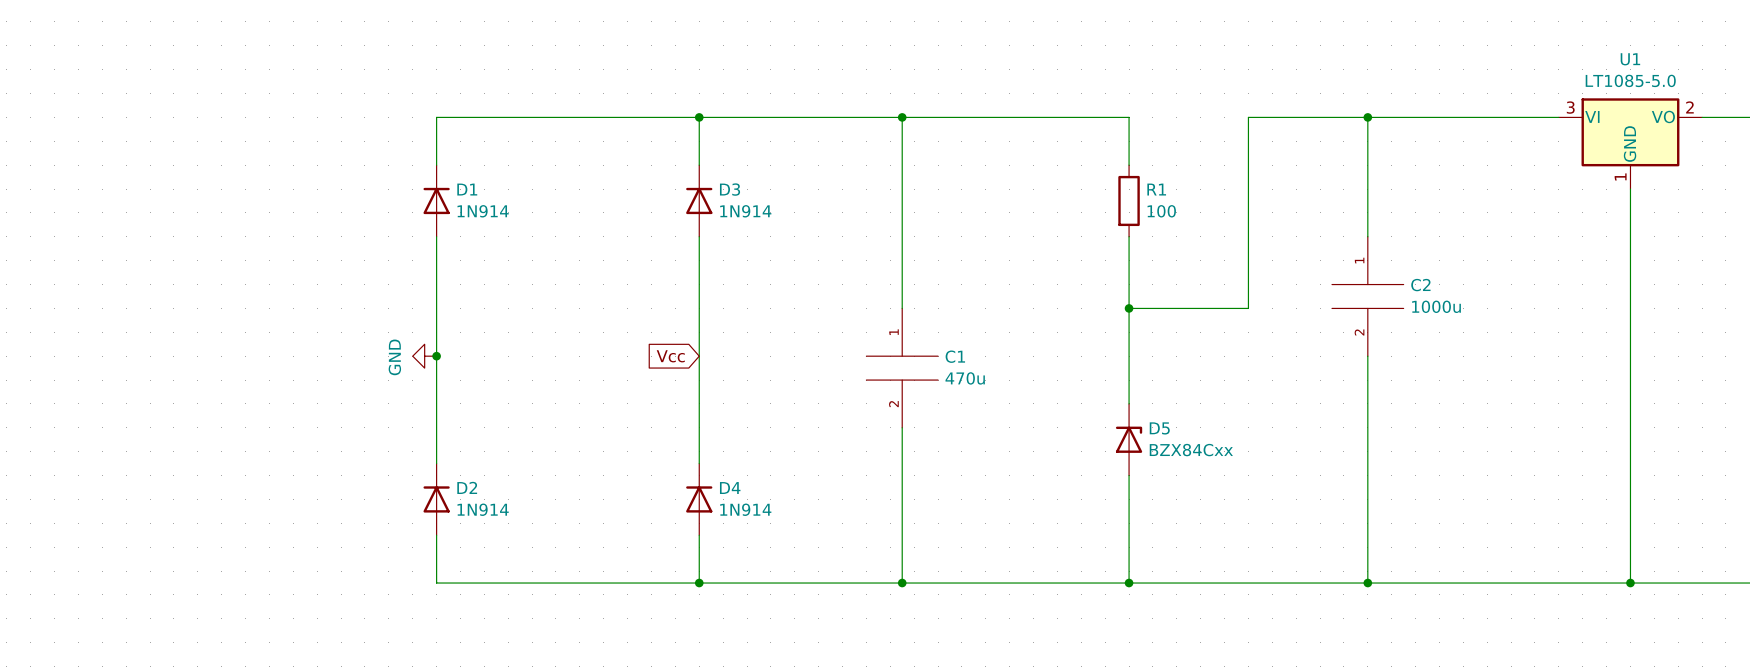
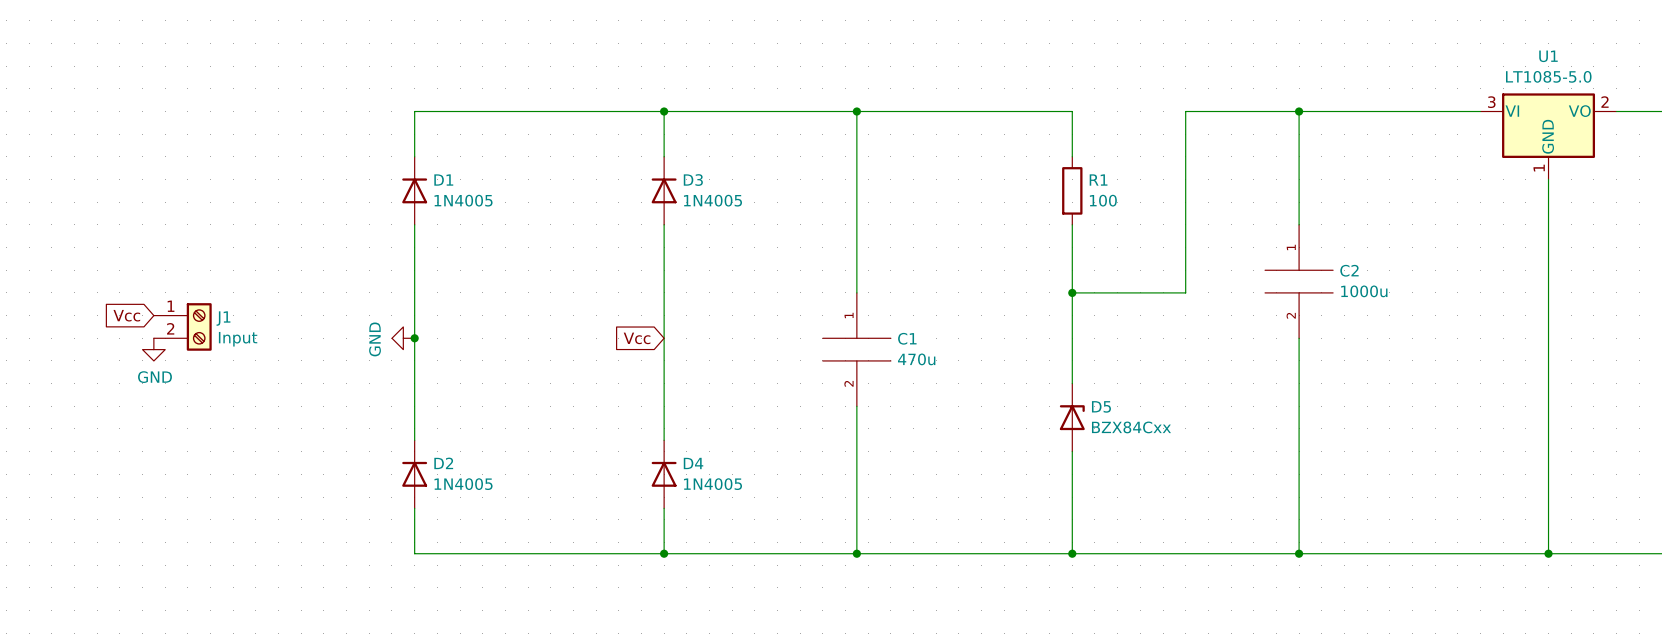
D1 value: 1N914 (483, 211) -> 1N4005 (463, 200)
D3 value: 1N914 (745, 211) -> 1N4005 (712, 200)
global label: none -> Vcc (126, 315)
J1: none -> Input (182, 326)
power symbol: none -> GND (153, 349)
D2 value: 1N914 (483, 509) -> 1N4005 (463, 484)
D4 value: 1N914 (745, 509) -> 1N4005 (712, 484)

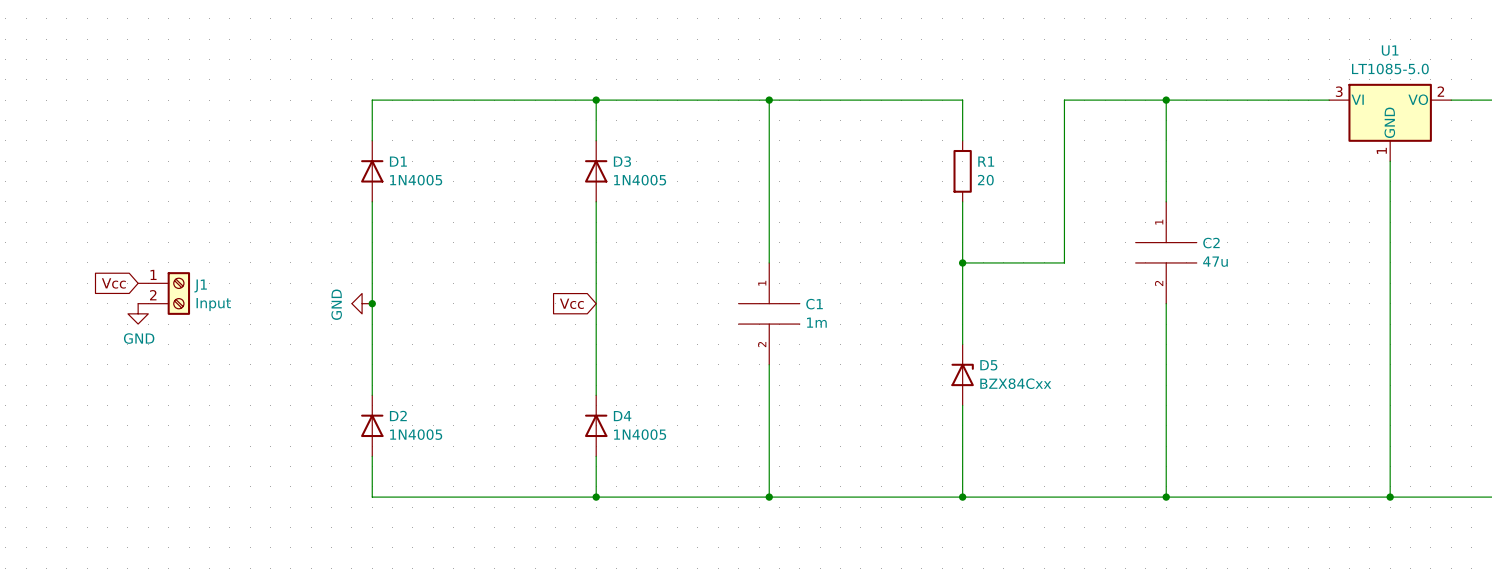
R1 value: 100 (1103, 200) -> 20 (985, 180)
C2 value: 1000u (1364, 291) -> 47u (1215, 261)
C1 value: 470u (916, 359) -> 1m (816, 322)

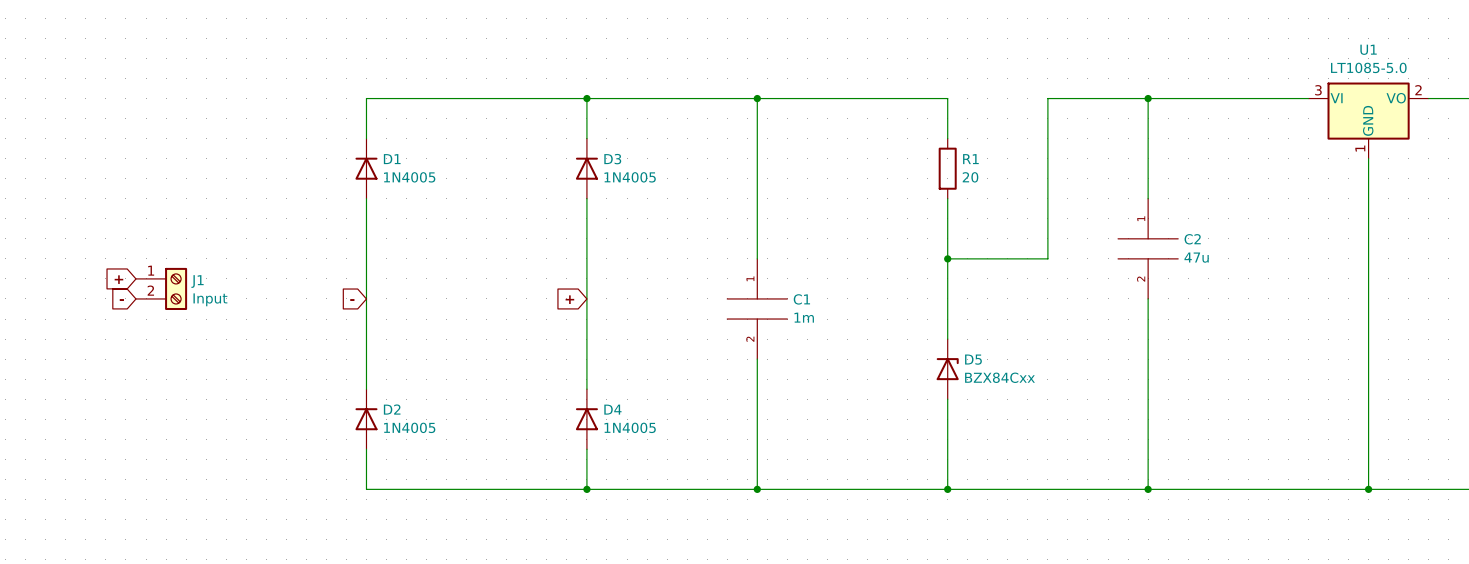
global label: Vcc (113, 283) -> + (118, 279)
power symbol: GND (362, 303) -> none
junction: (372, 303) -> none
global label: Vcc (571, 303) -> + (569, 299)
global label: none -> - (121, 300)
global label: none -> - (352, 300)
power symbol: GND (138, 313) -> none

